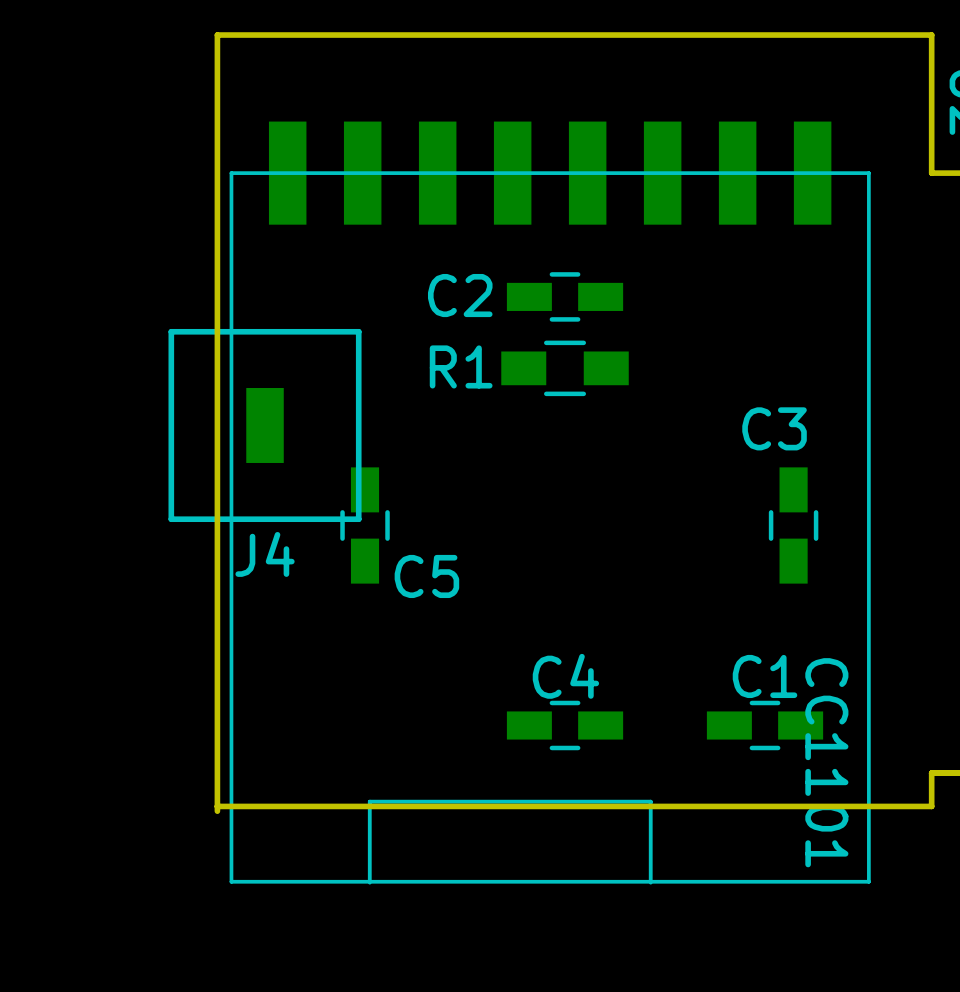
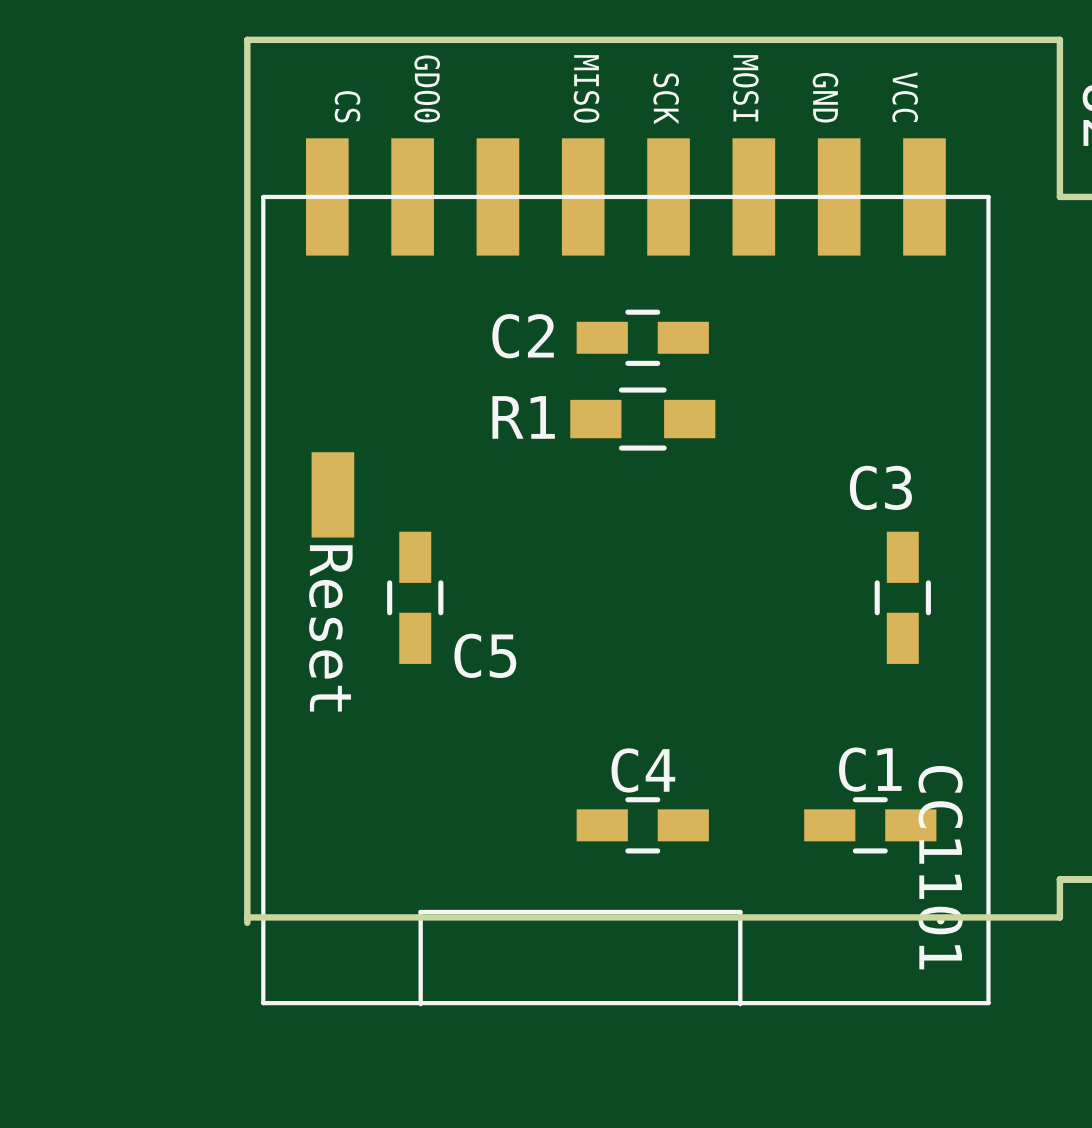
text: none -> GDO0 (427, 88)
text: none -> MISO (586, 88)
text: none -> MOSI (745, 88)
text: none -> GND (825, 97)
text: none -> SCK (666, 98)
text: none -> VCC (905, 97)
text: none -> CS (347, 106)
J4: (265, 425) -> none
Reset: none -> (332, 494)

